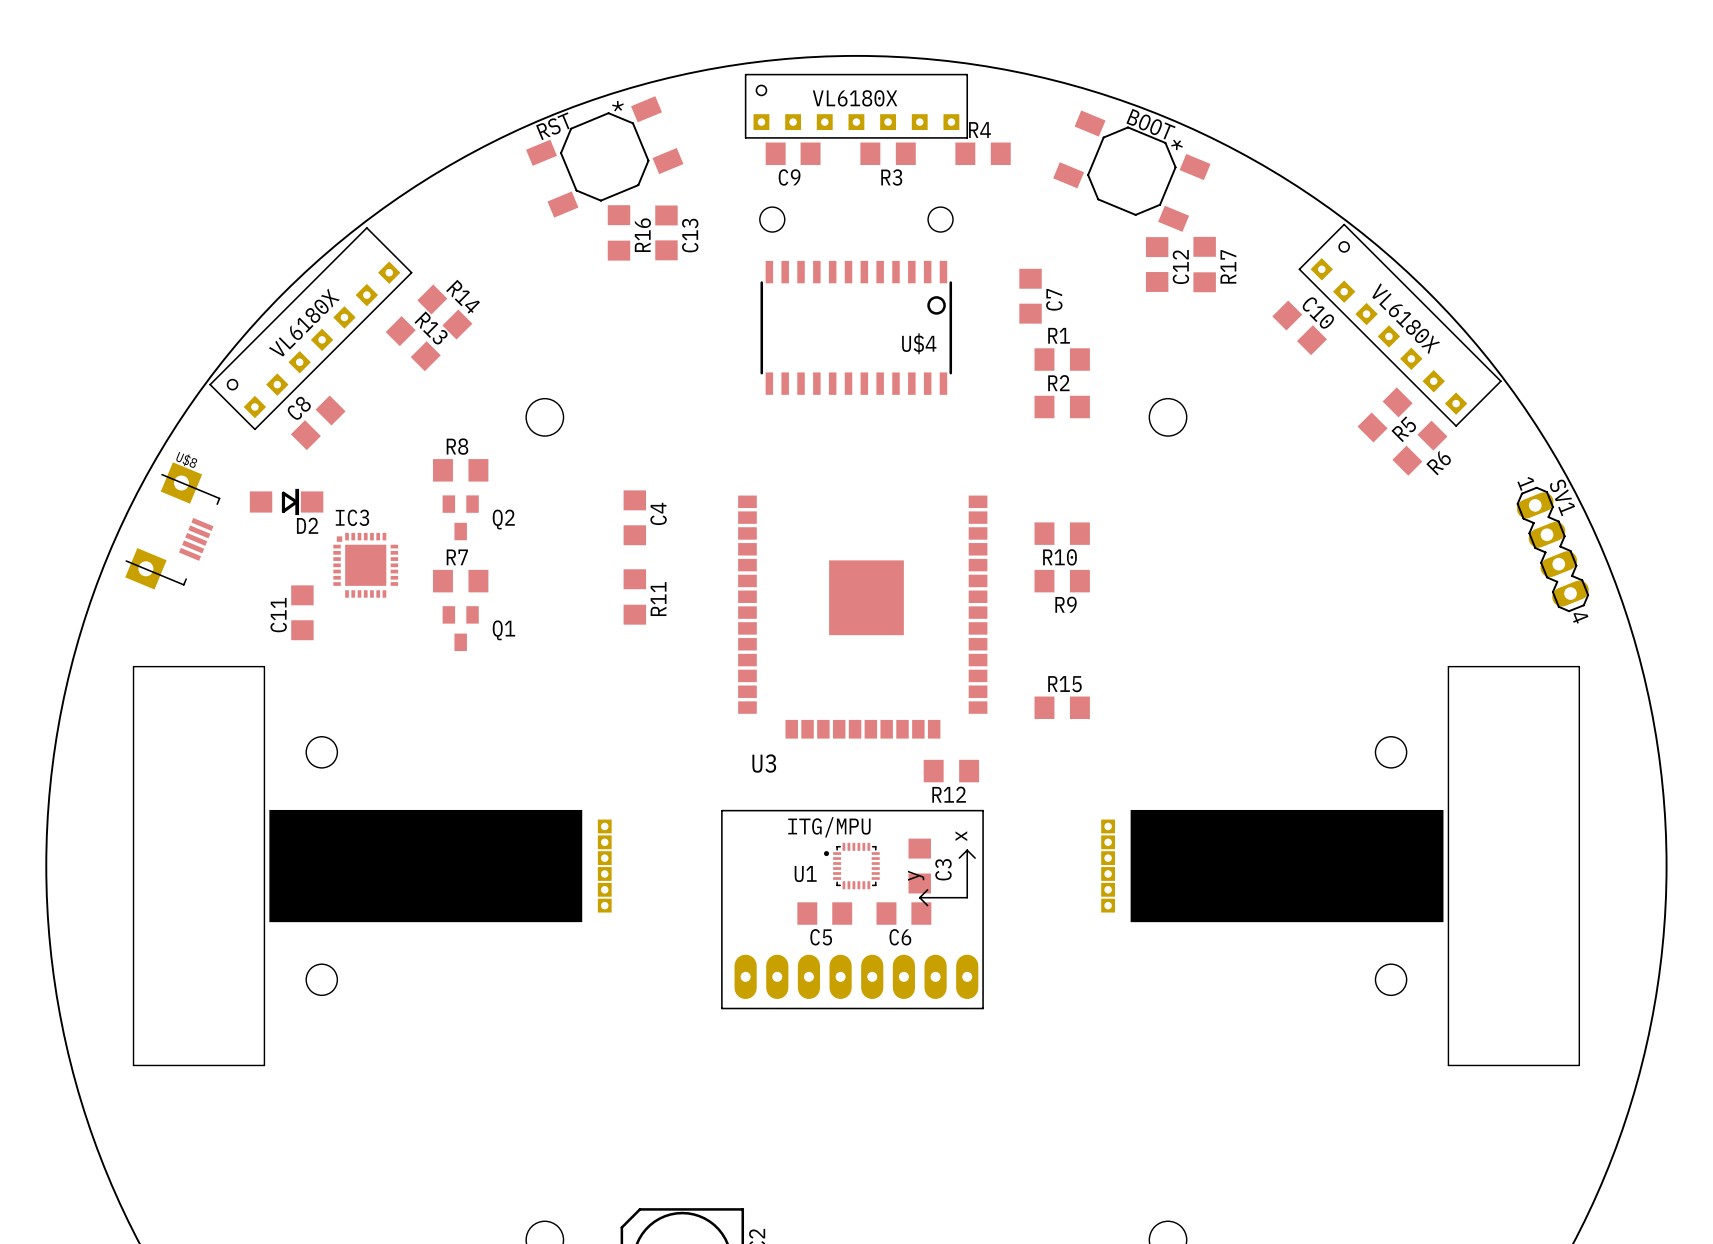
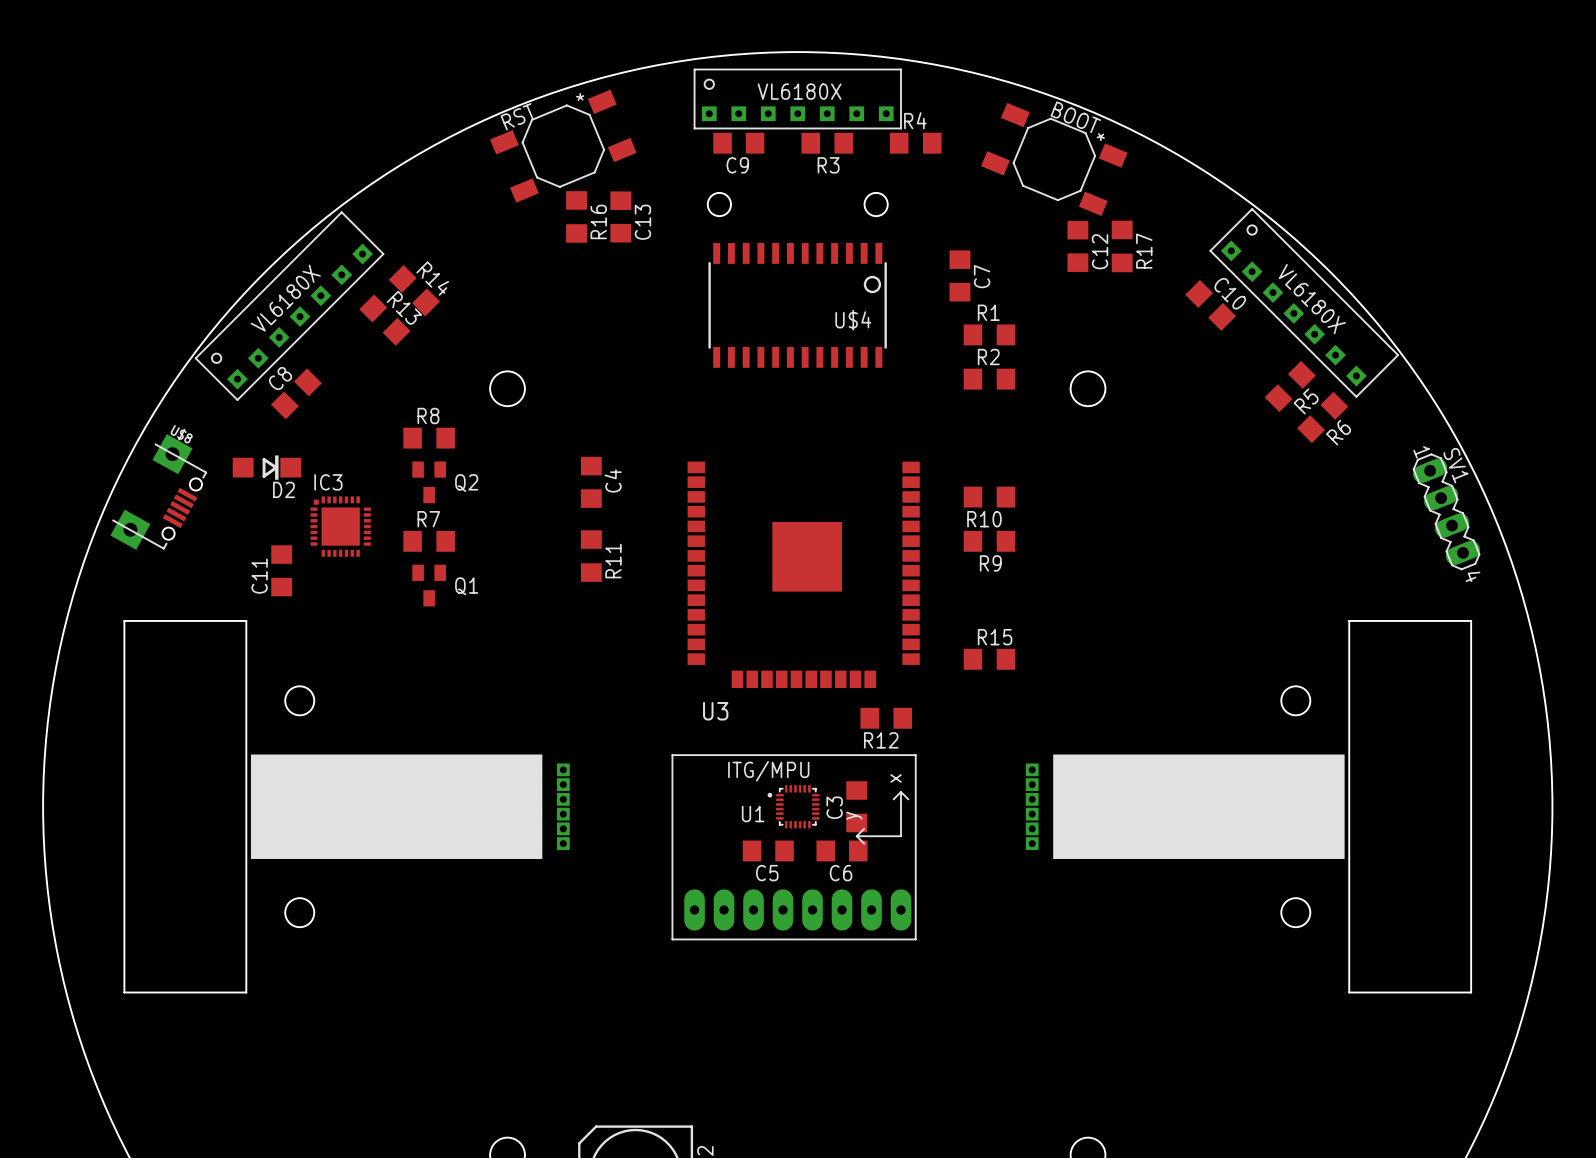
U$8 footprint: [125, 462, 221, 590] -> [110, 434, 207, 550]
C3 name position: C3 (943, 869) -> C3 (834, 807)

